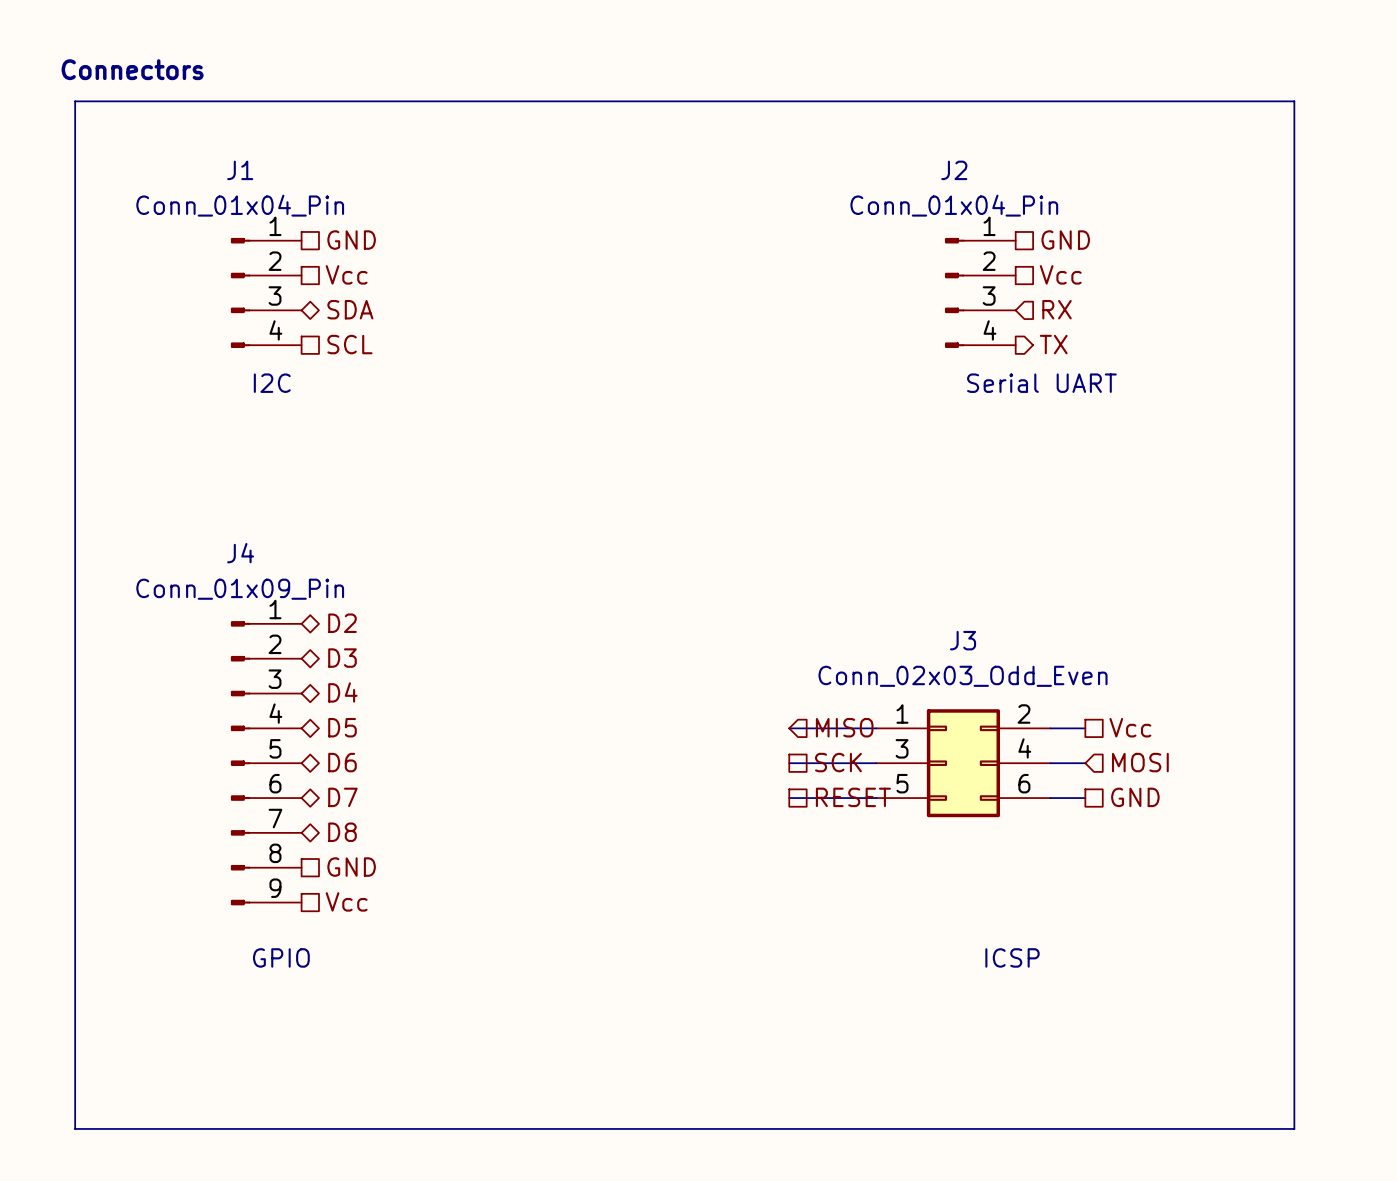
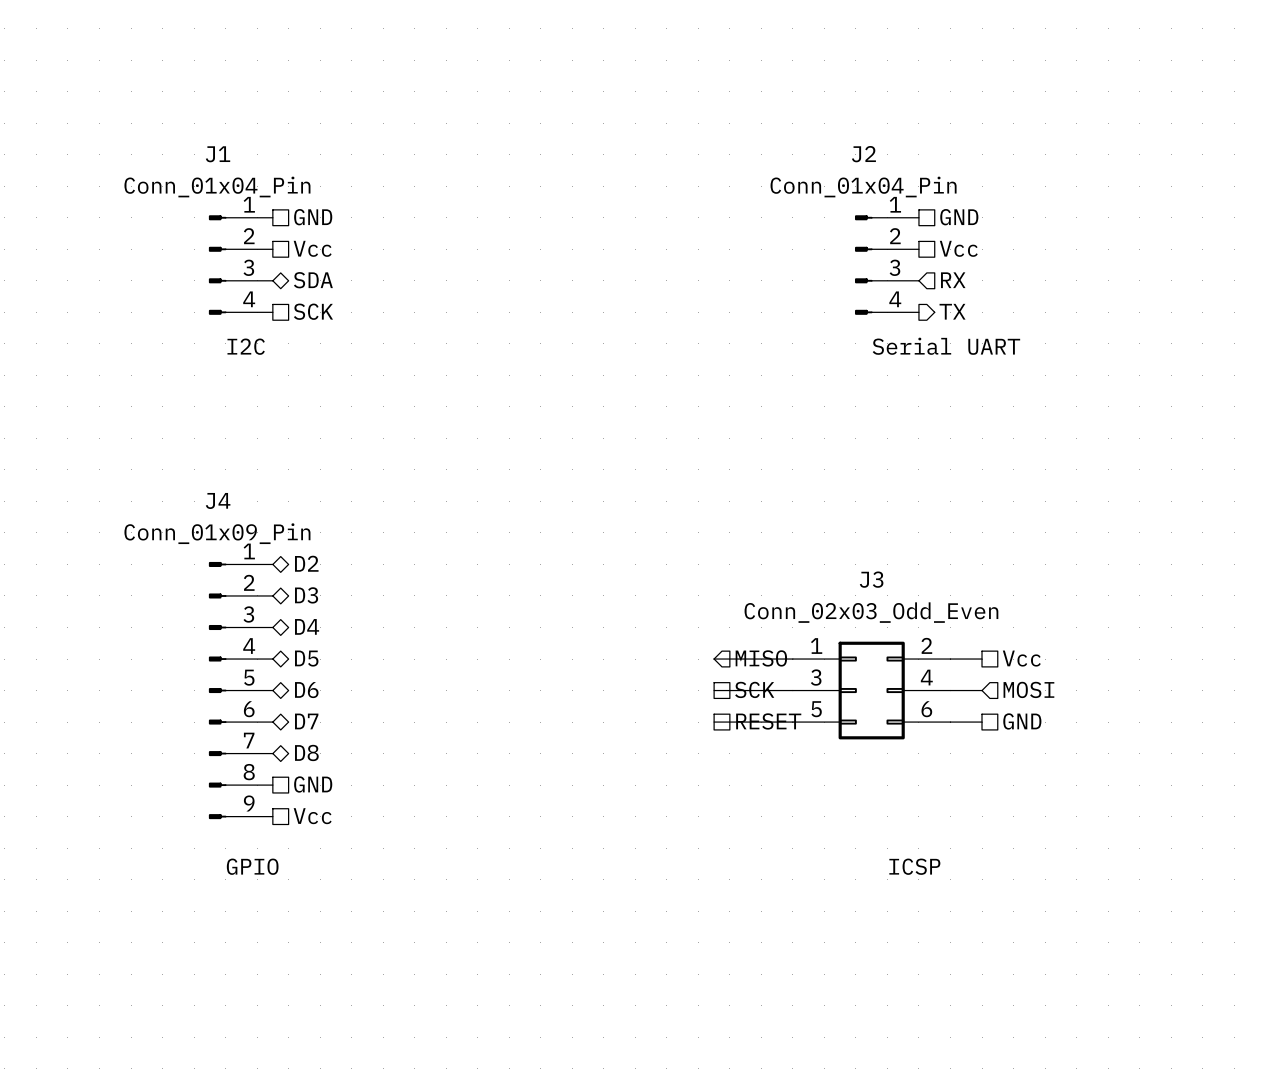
text: Connectors (132, 69) -> none
line: (75, 101) (1294, 101) (1294, 1128) (75, 1128) (75, 101) -> none
hierarchical label: SCL (349, 344) -> SCK (313, 311)

